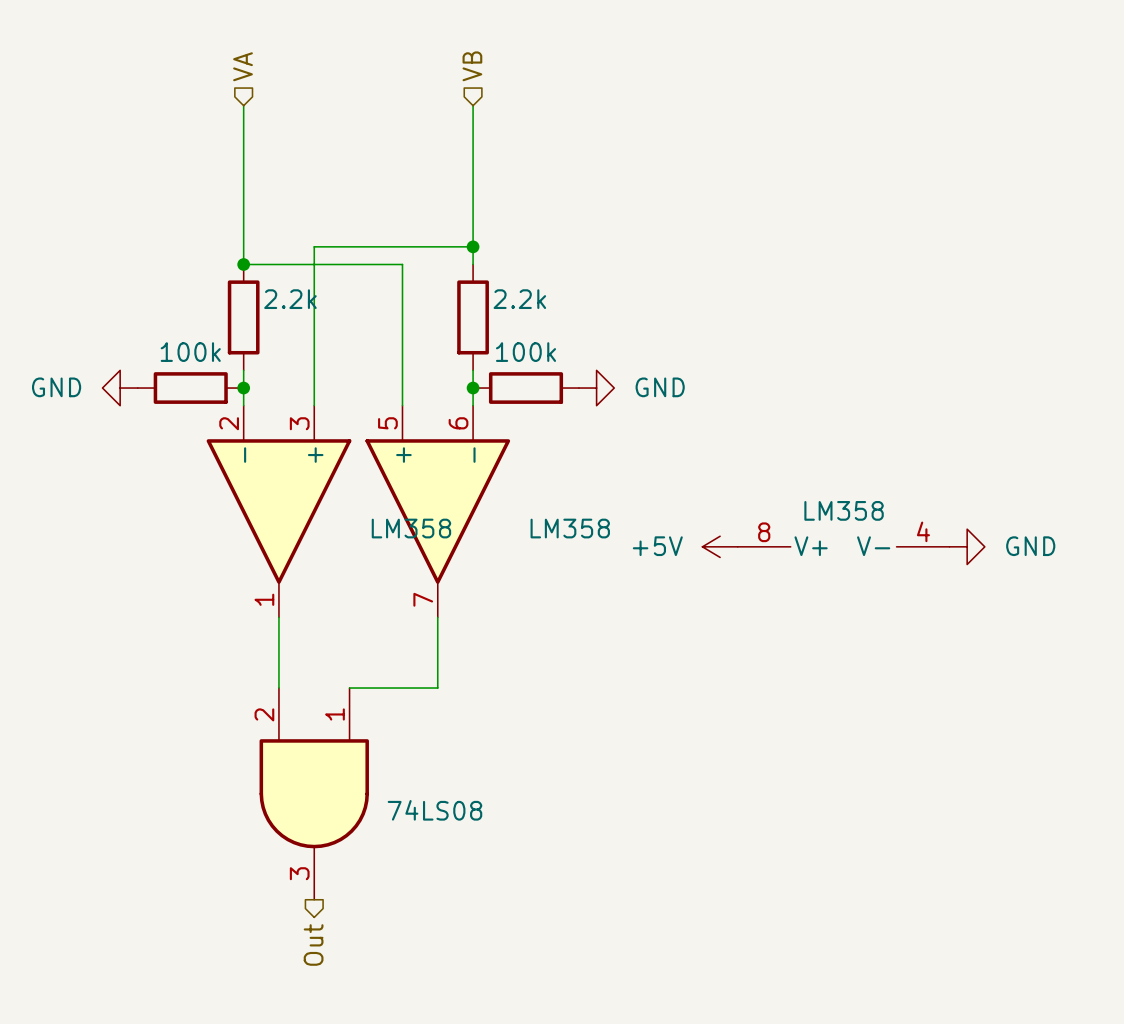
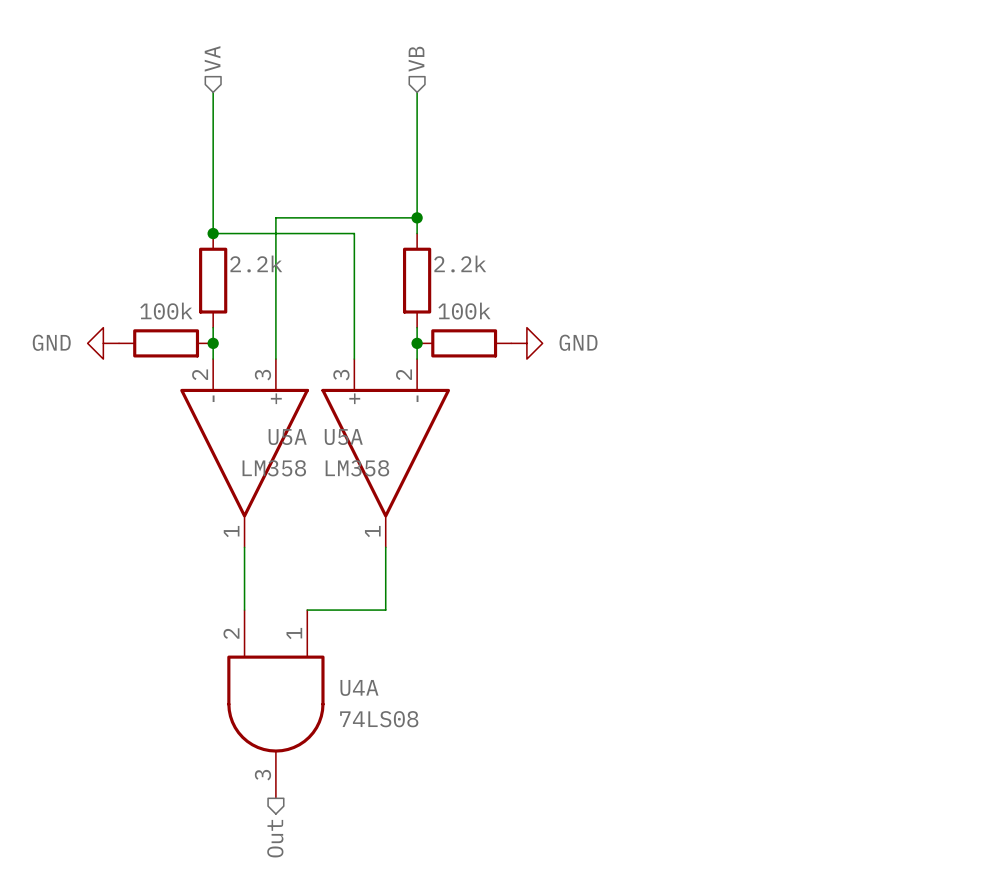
U5A pin number: 5 (387, 423) -> 3 (341, 375)
U5A pin number: 6 (458, 423) -> 2 (404, 374)
U5A name: none -> U5A (287, 437)
U5A name: none -> U5A (343, 437)
U5A value position: LM358 (570, 528) -> LM358 (274, 468)
power symbol: +5V (720, 546) -> none
part: LM358 (843, 546) -> none
power symbol: GND (967, 546) -> none
U5A pin number: 7 (423, 599) -> 1 (372, 531)
U4A name: none -> U4A (359, 687)

